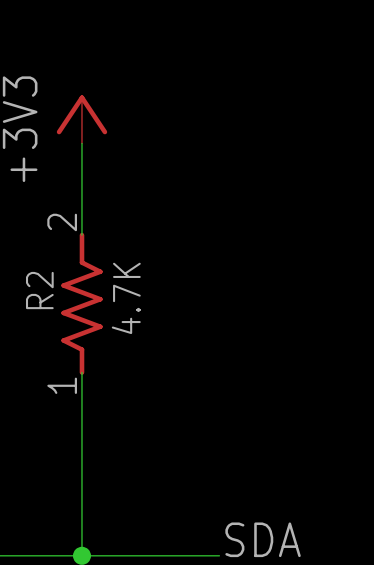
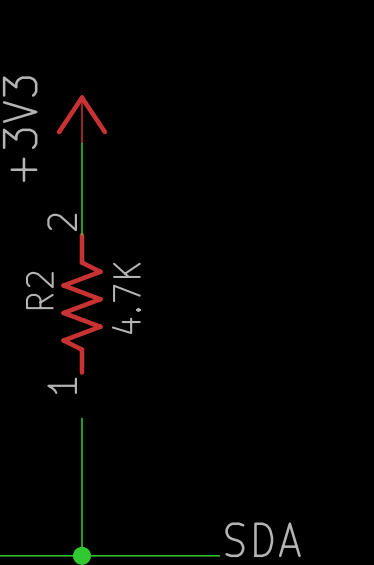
wire: (81, 372) (81, 418) -> none

